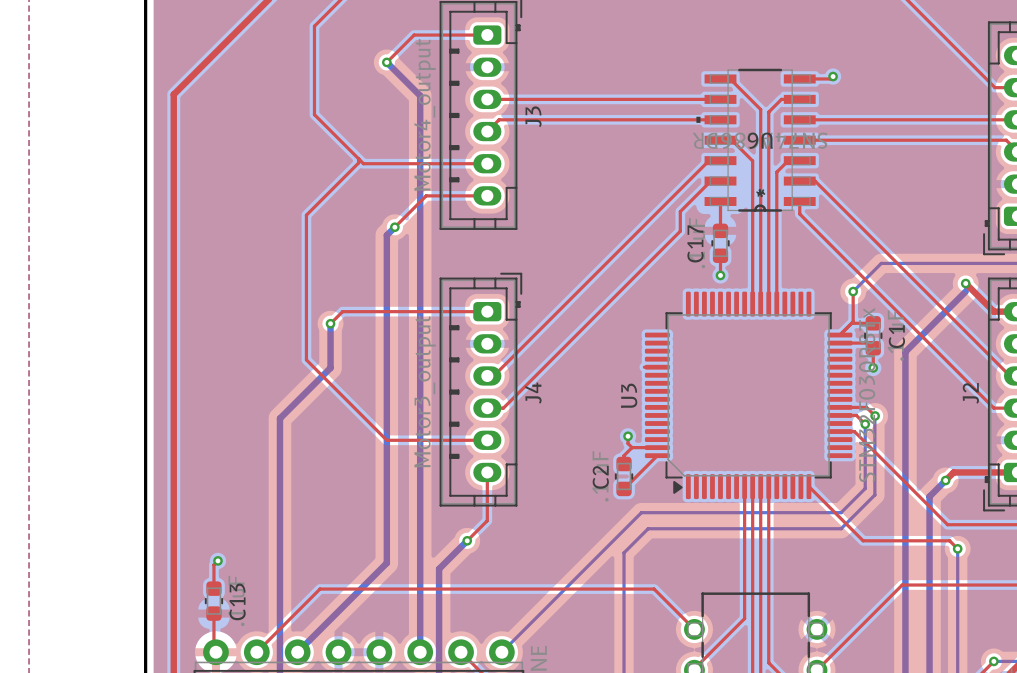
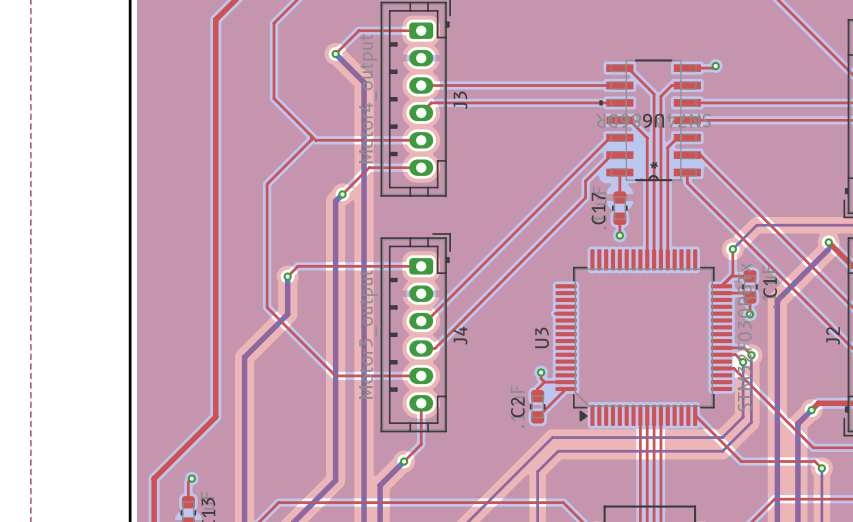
top track: (246, 22) (173, 94) (173, 560) -> (215, 19) (215, 417) (154, 478)

